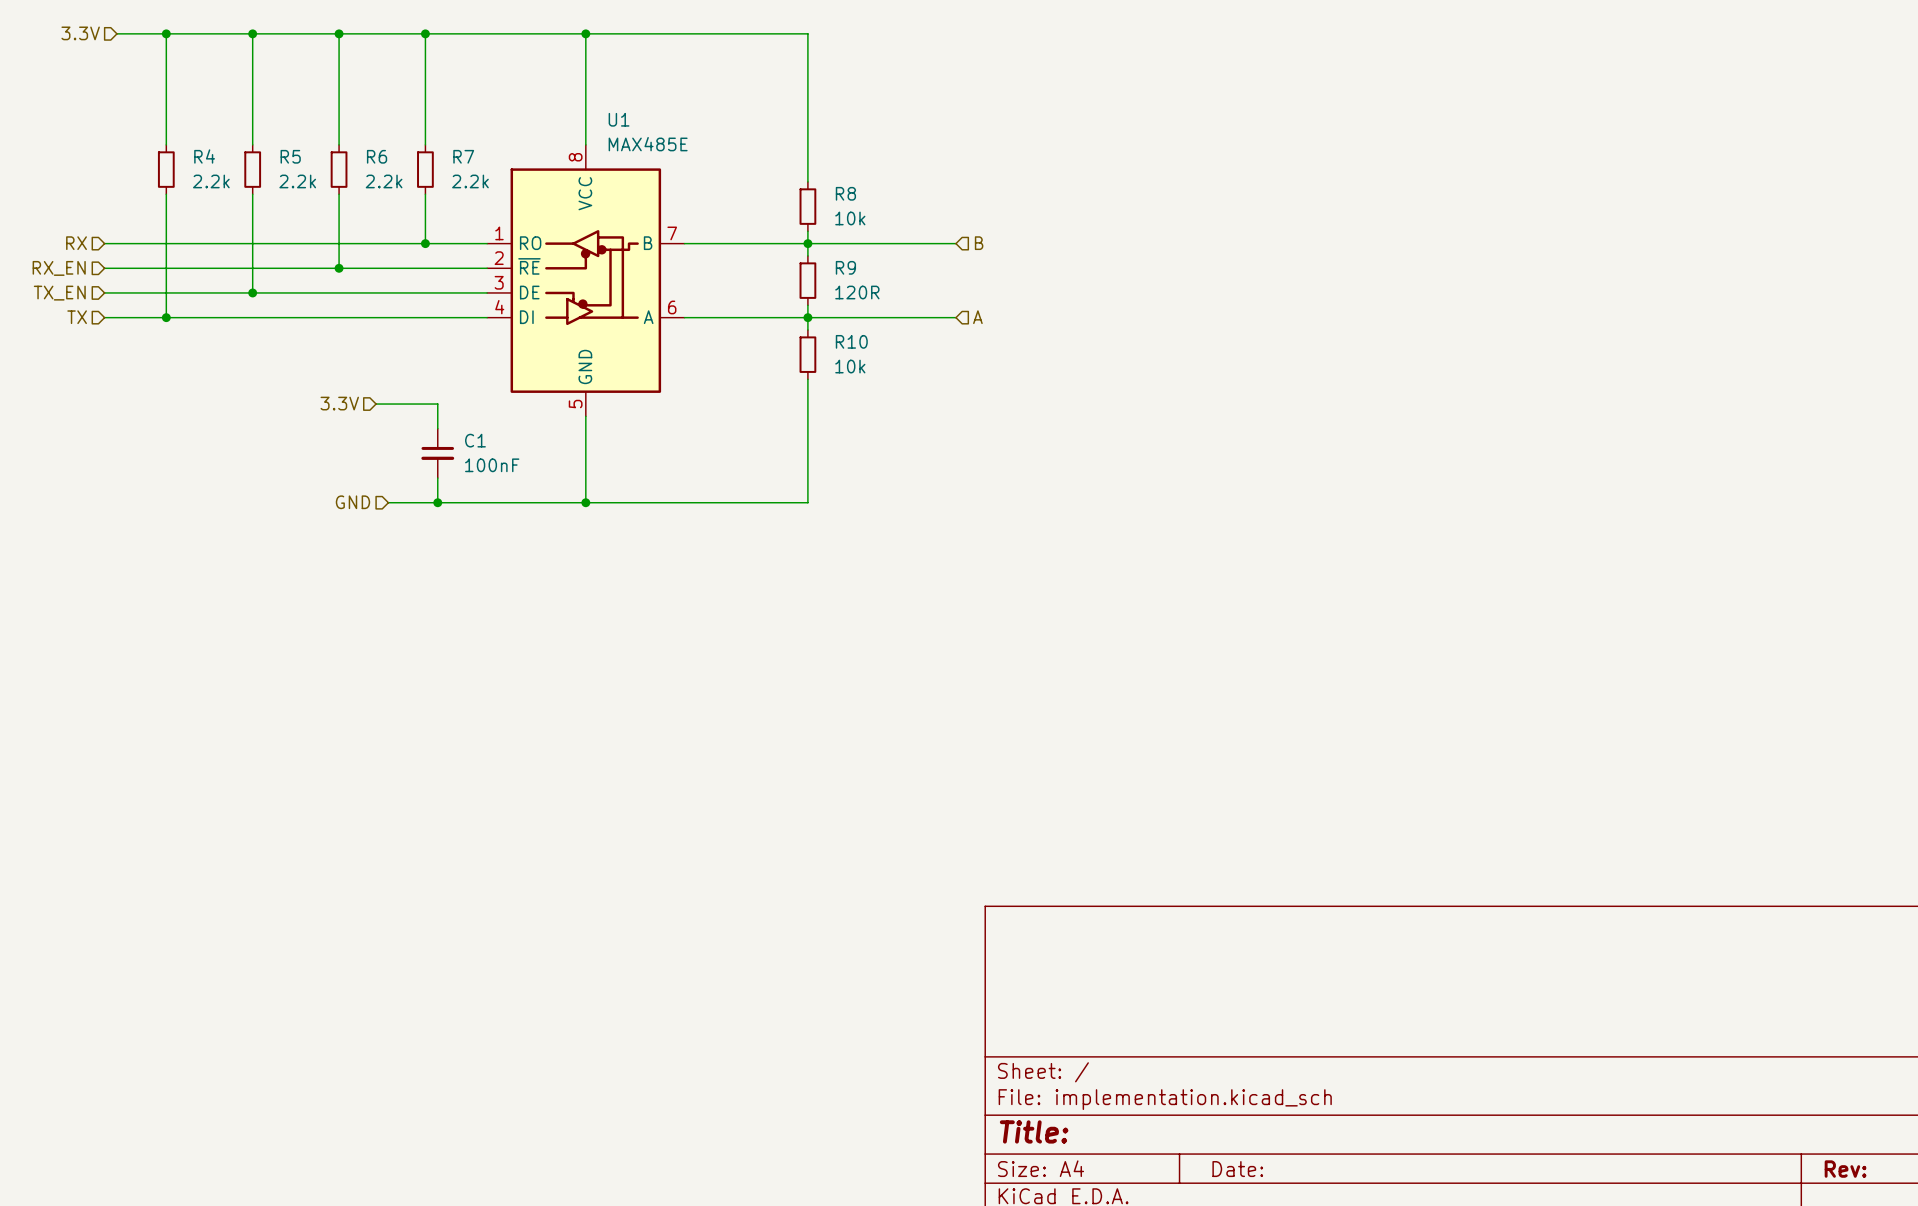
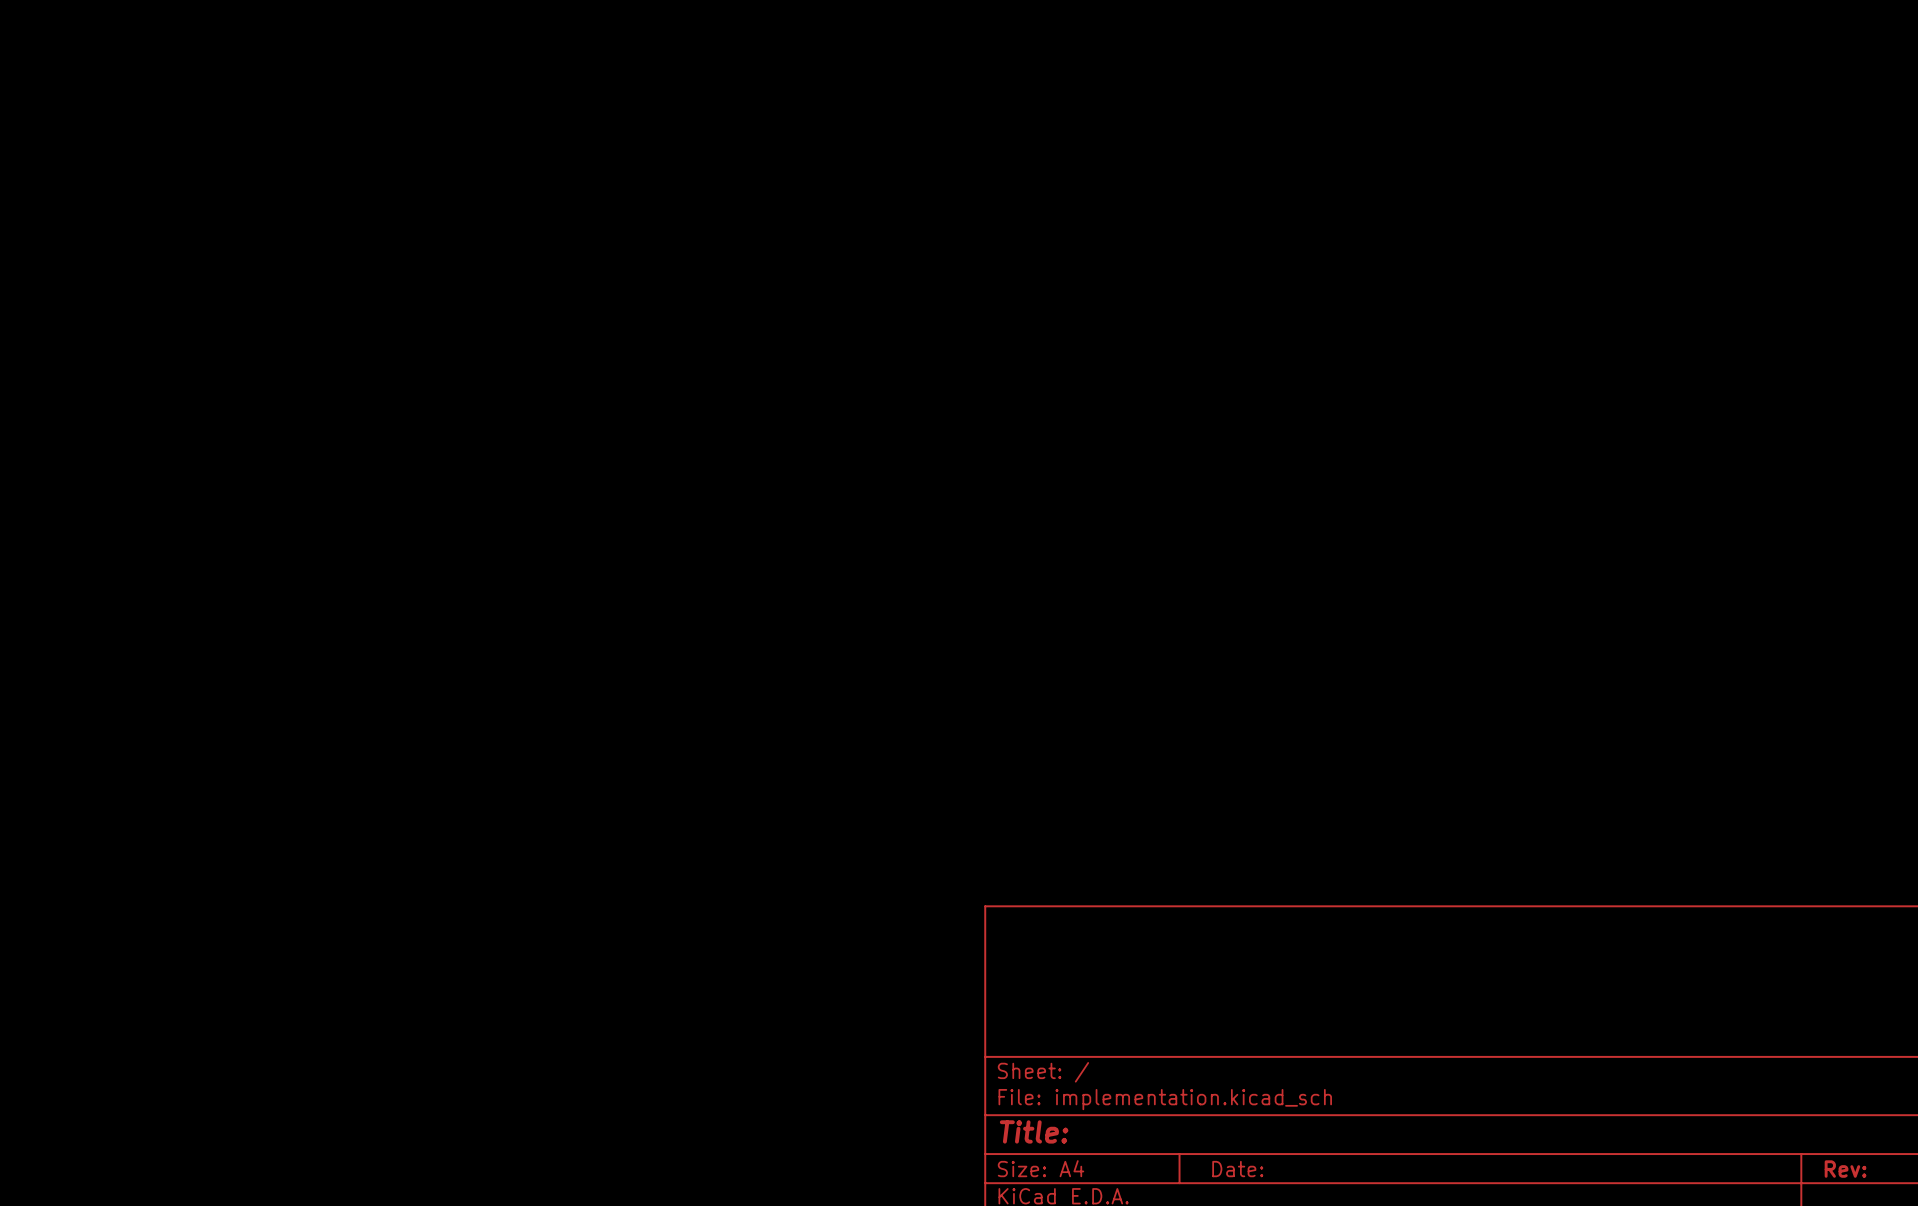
hierarchical label: 3.3V (80, 33) -> none
wire: (116, 33) (807, 33) (807, 181) -> none
wire: (166, 33) (166, 144) -> none
junction: (166, 33) -> none
wire: (252, 33) (252, 144) -> none
junction: (252, 33) -> none
wire: (339, 33) (339, 144) -> none
junction: (339, 33) -> none
wire: (425, 33) (425, 144) -> none
junction: (425, 33) -> none
wire: (585, 33) (585, 144) -> none
junction: (585, 33) -> none
R4: 2.2k (166, 169) -> none
R5: 2.2k (252, 169) -> none
R6: 2.2k (339, 169) -> none
R7: 2.2k (425, 169) -> none
wire: (166, 194) (166, 317) -> none
wire: (252, 194) (252, 292) -> none
wire: (339, 194) (339, 268) -> none
wire: (425, 194) (425, 243) -> none
R8: 10k (807, 206) -> none
wire: (807, 231) (807, 255) -> none
hierarchical label: RX (76, 243) -> none
wire: (104, 243) (487, 243) -> none
junction: (425, 243) -> none
wire: (684, 243) (955, 243) -> none
junction: (807, 243) -> none
hierarchical label: B (979, 243) -> none
hierarchical label: RX_EN (59, 268) -> none
wire: (104, 268) (487, 268) -> none
junction: (339, 268) -> none
U1: MAX485E (585, 280) -> none
R9: 120R (807, 280) -> none
wire: (104, 292) (487, 292) -> none
junction: (252, 292) -> none
hierarchical label: TX_EN (59, 293) -> none
wire: (807, 305) (807, 329) -> none
hierarchical label: TX (77, 317) -> none
wire: (104, 317) (487, 317) -> none
junction: (166, 317) -> none
wire: (684, 317) (955, 317) -> none
junction: (807, 317) -> none
hierarchical label: A (977, 317) -> none
R10: 10k (807, 354) -> none
wire: (807, 379) (807, 502) (388, 502) -> none
hierarchical label: 3.3V (339, 403) -> none
wire: (376, 404) (437, 404) (437, 428) -> none
wire: (585, 416) (585, 502) -> none
C1: 100nF (437, 453) -> none
wire: (437, 478) (437, 502) -> none
hierarchical label: GND (352, 502) -> none
junction: (437, 502) -> none
junction: (585, 502) -> none

